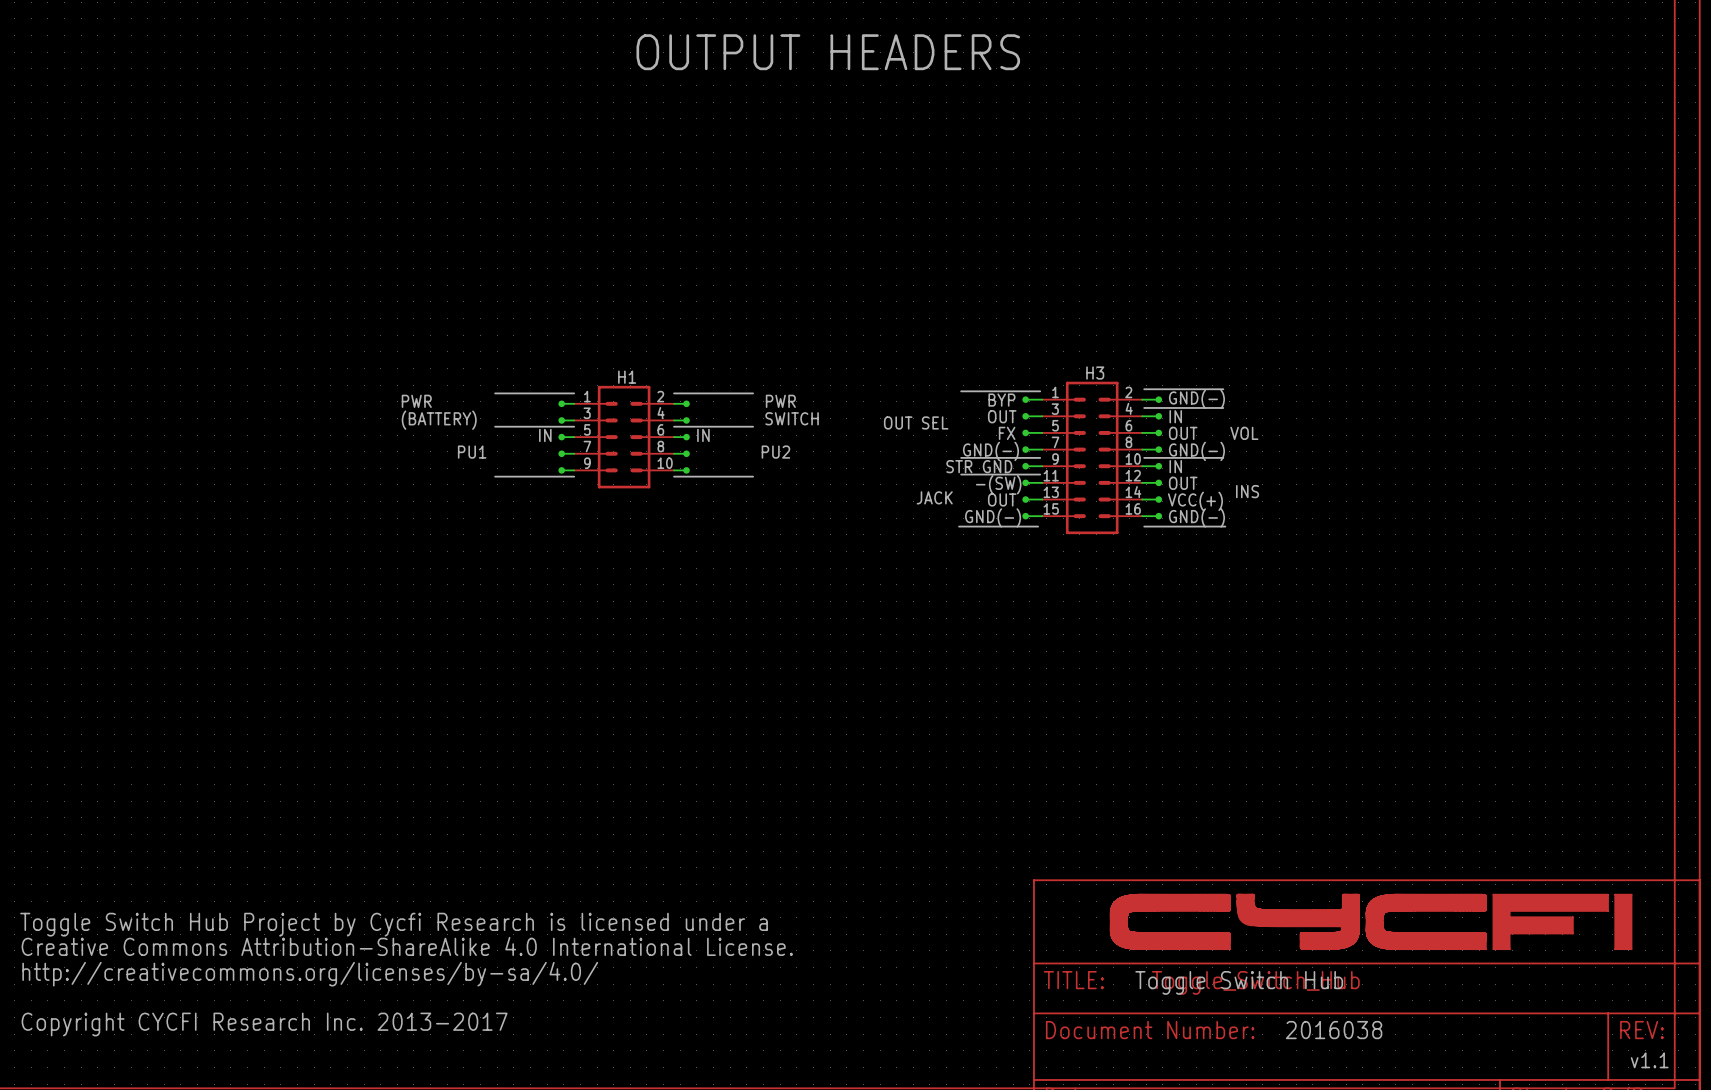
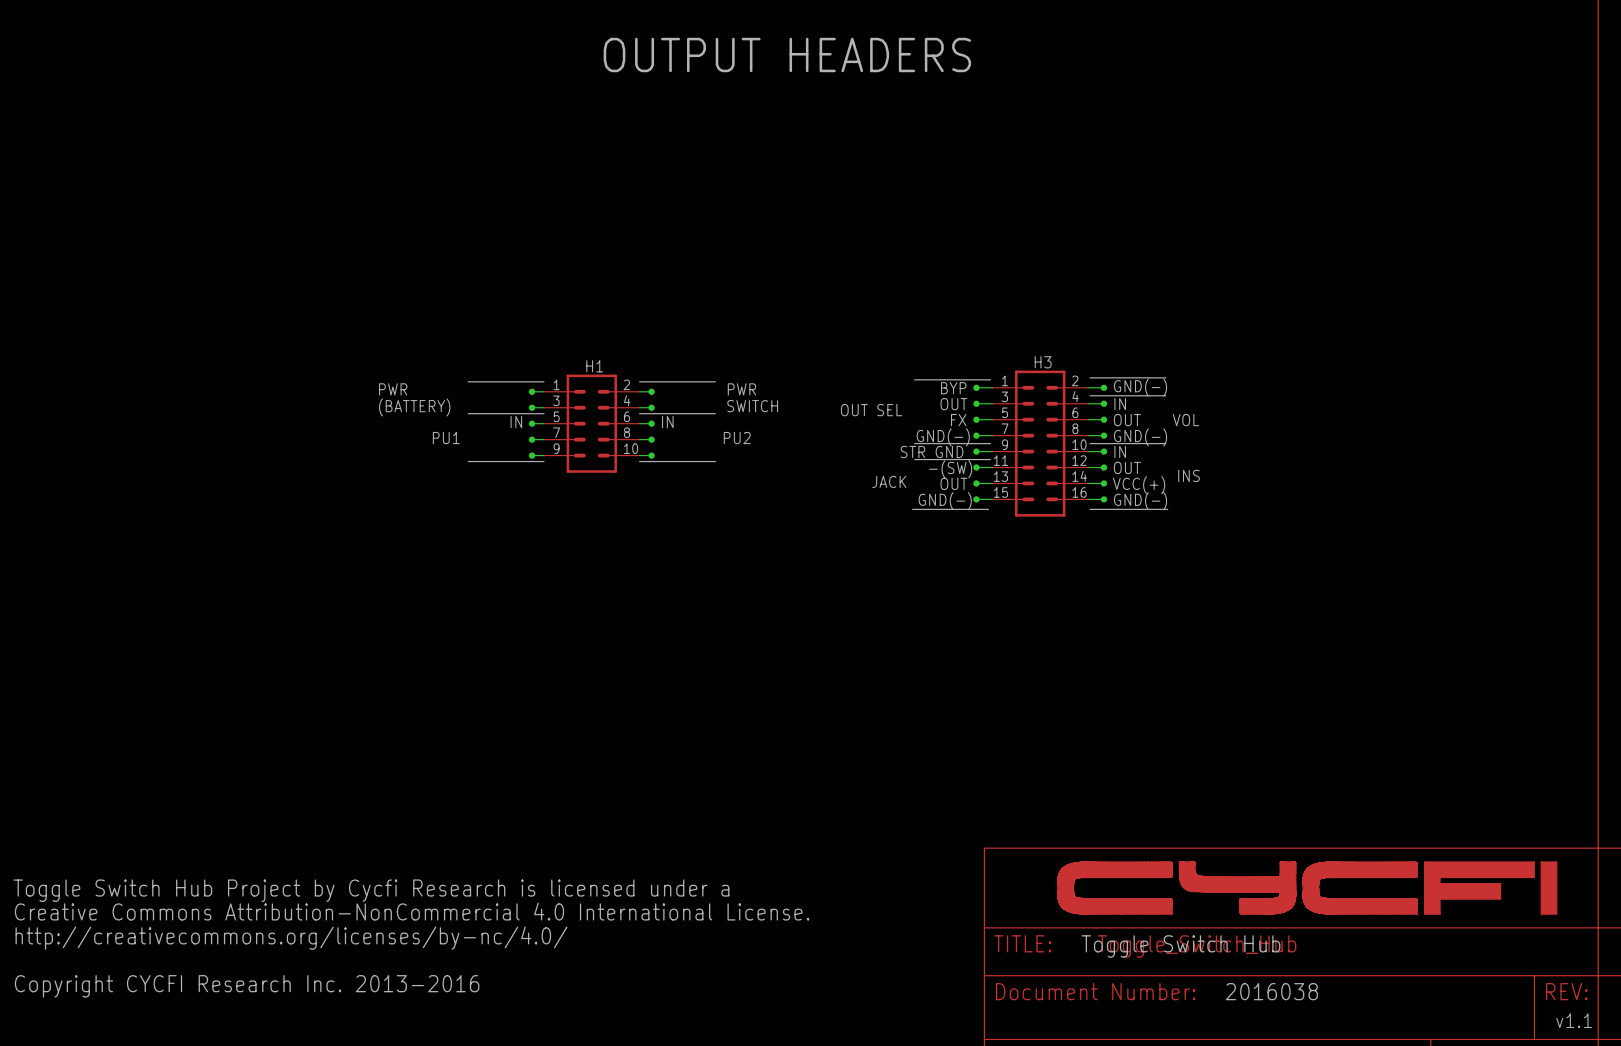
text: Creative Commons Attribution-ShareAlike 4.0 International License. (407, 946) -> Creative Commons Attribution-NonCommercial 4.0 International License. (412, 911)
text: http://creativecommons.org/licenses/by-sa/4.0/ (310, 974) -> http://creativecommons.org/licenses/by-nc/4.0/ (291, 938)
text: Copyright CYCFI Research Inc. 2013-2017 (264, 1024) -> Copyright CYCFI Research Inc. 2013-2016 (247, 986)

